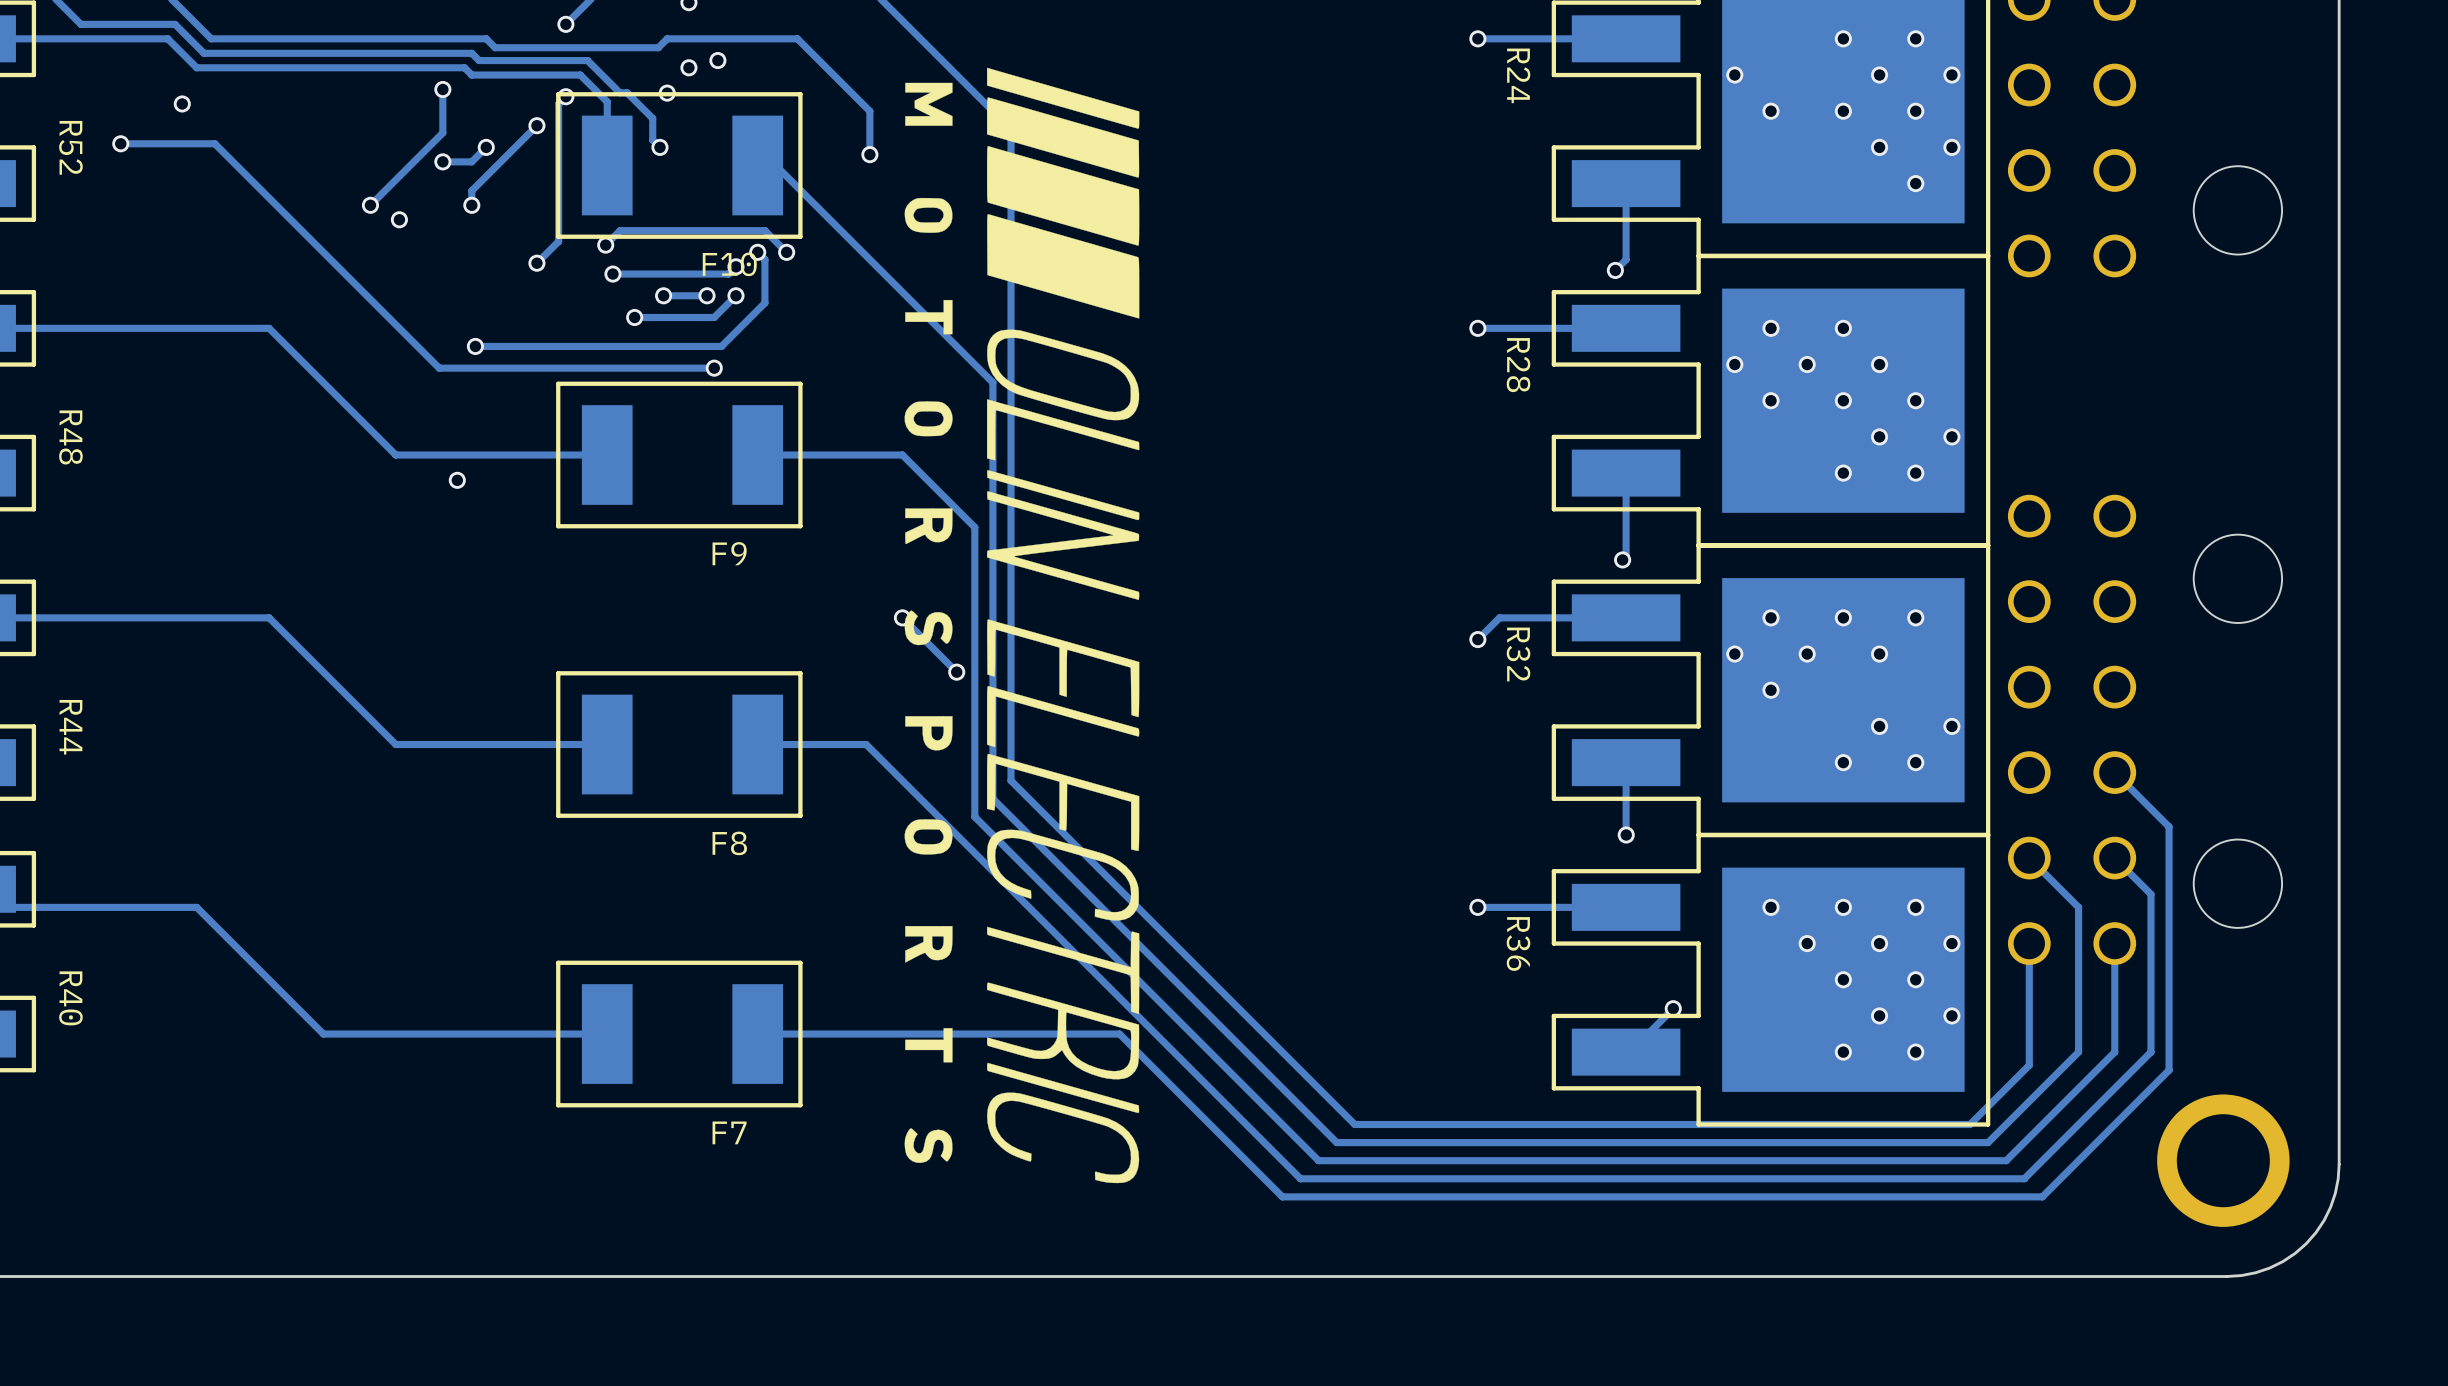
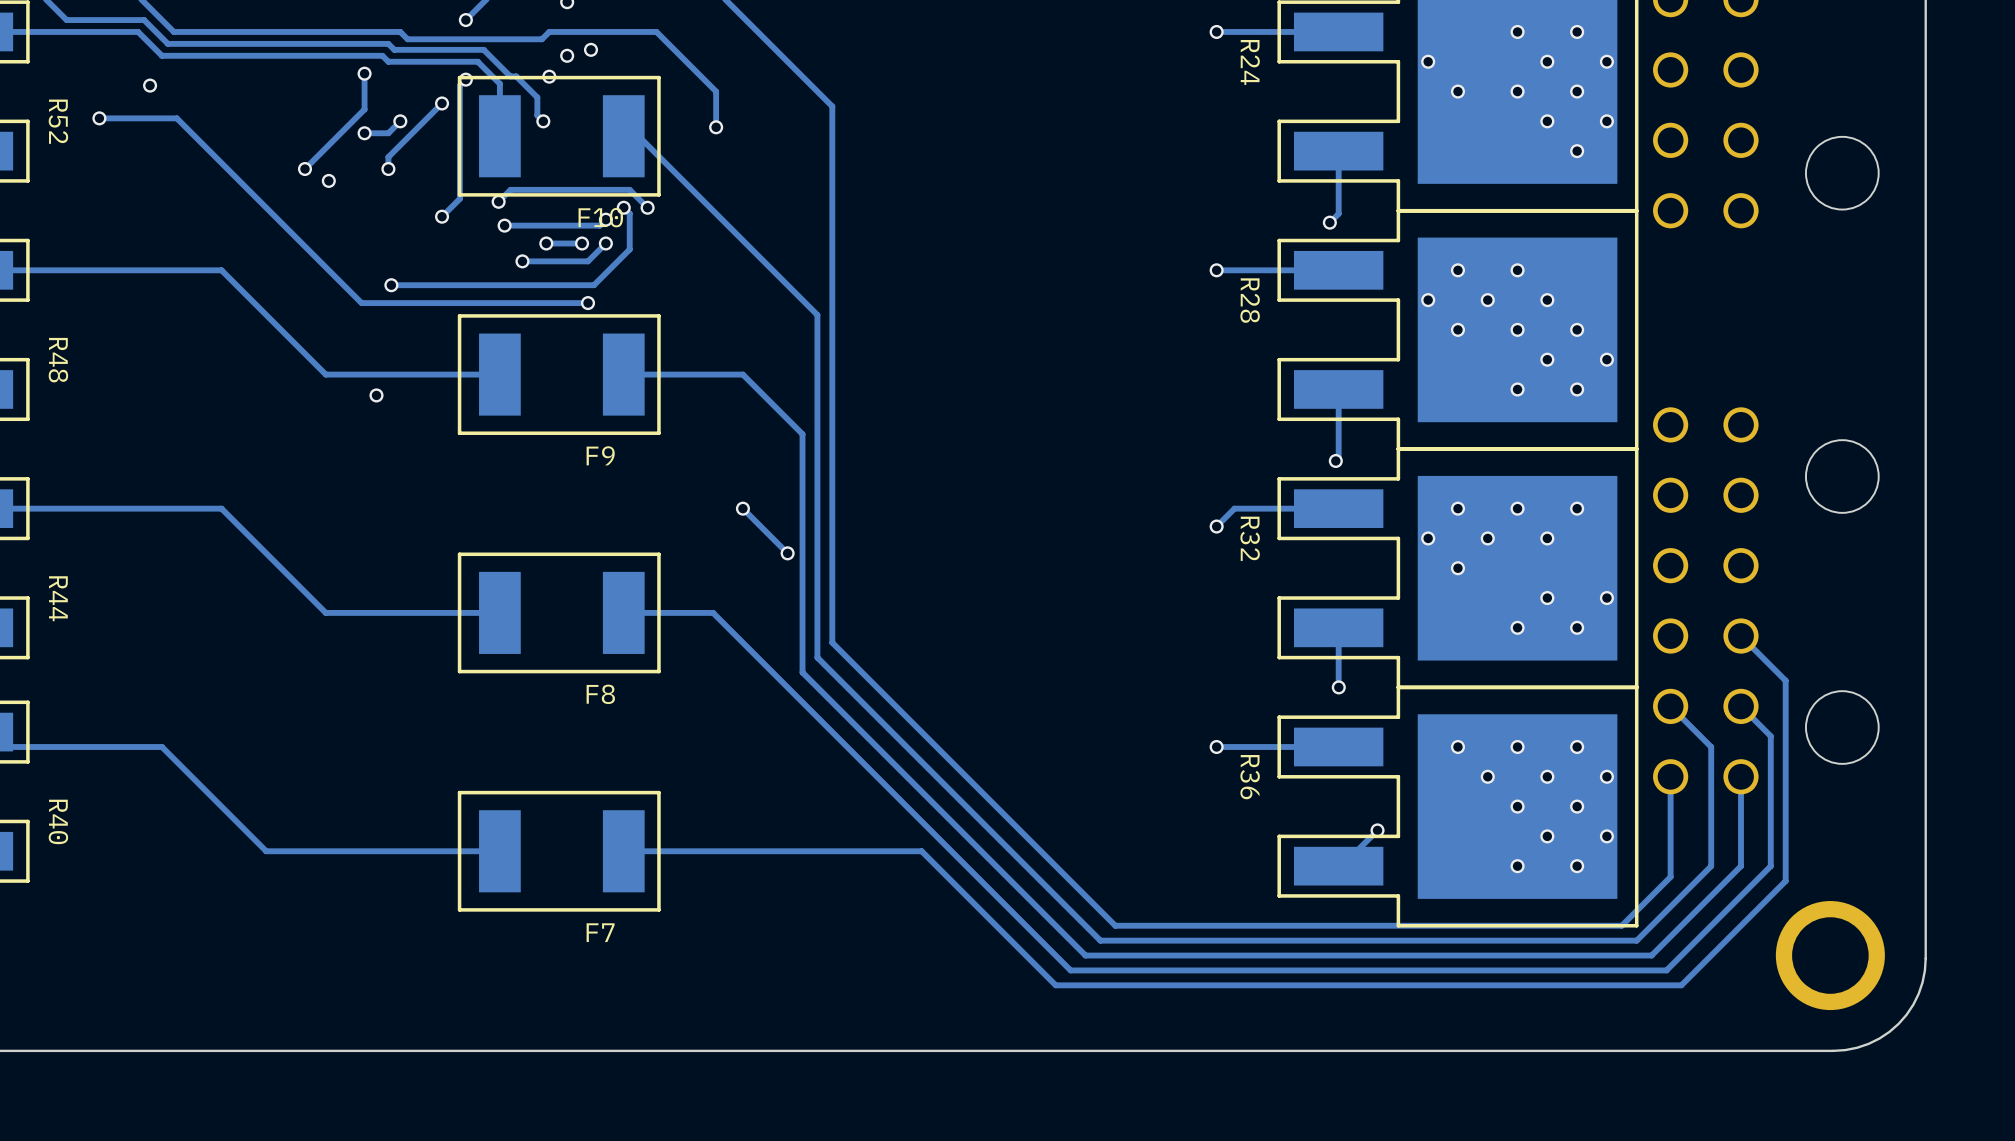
drawing: [904, 67, 1140, 1184] -> none

